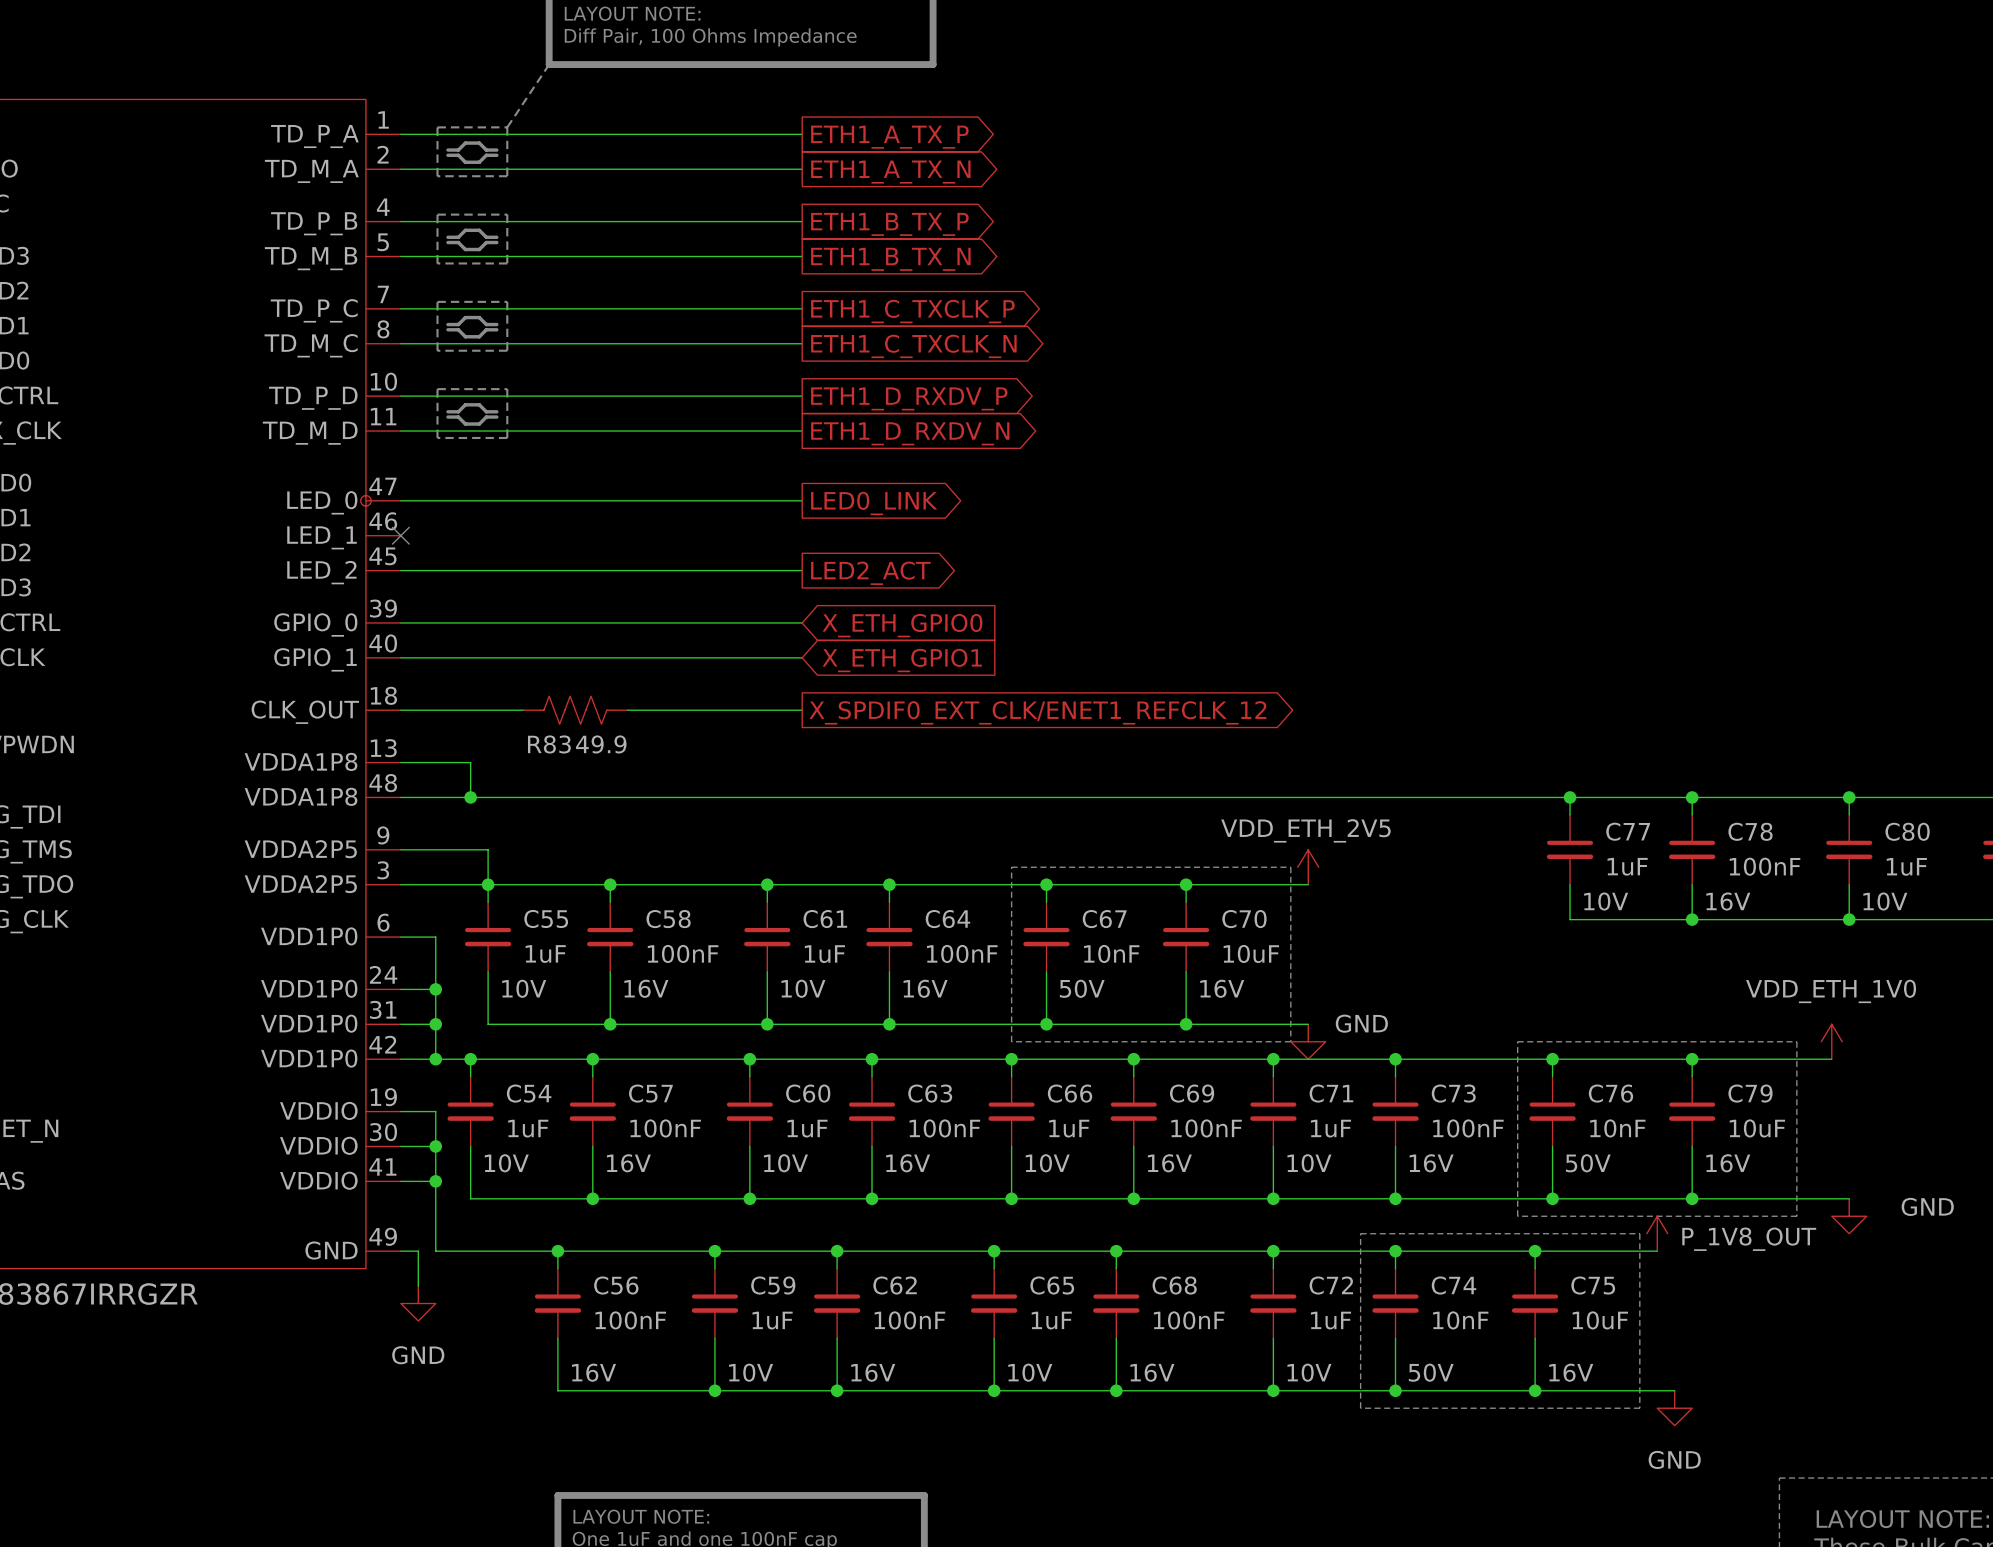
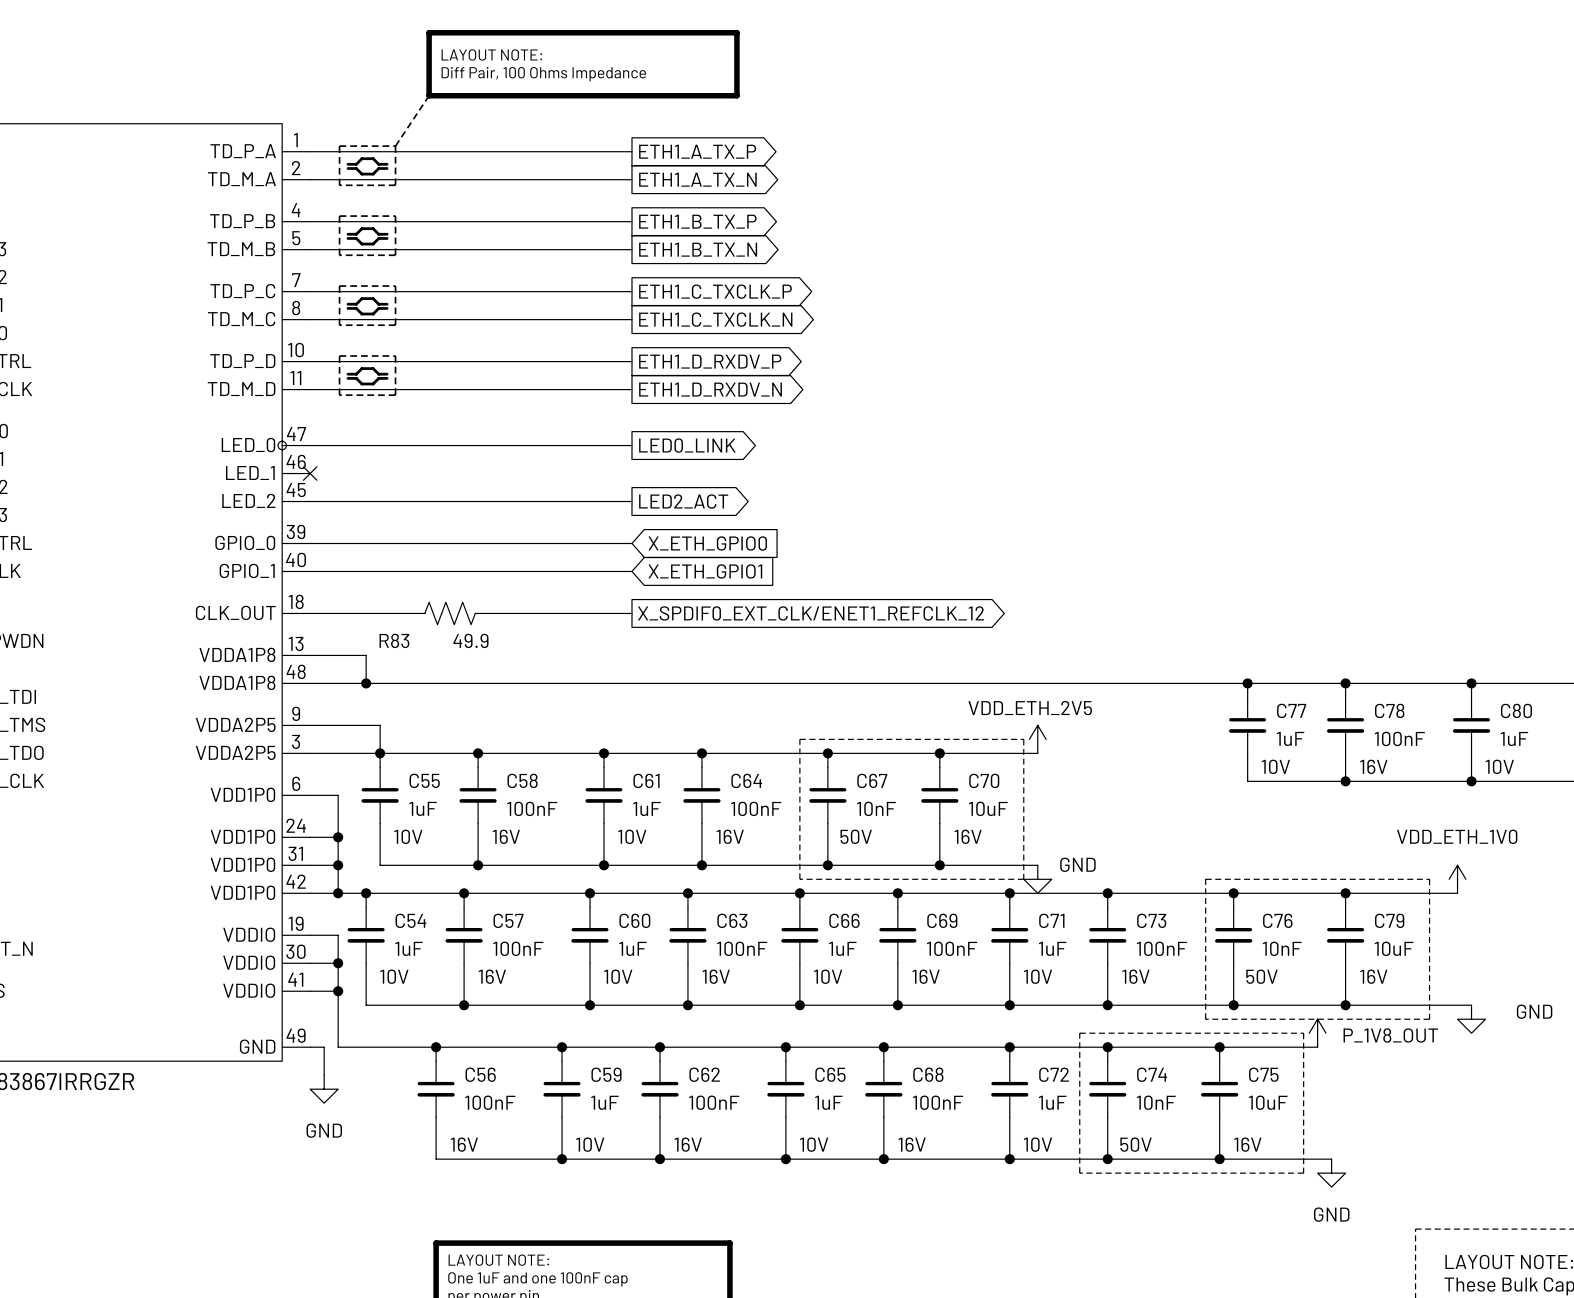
R83 name position: R83 (549, 744) -> R83 (394, 640)

